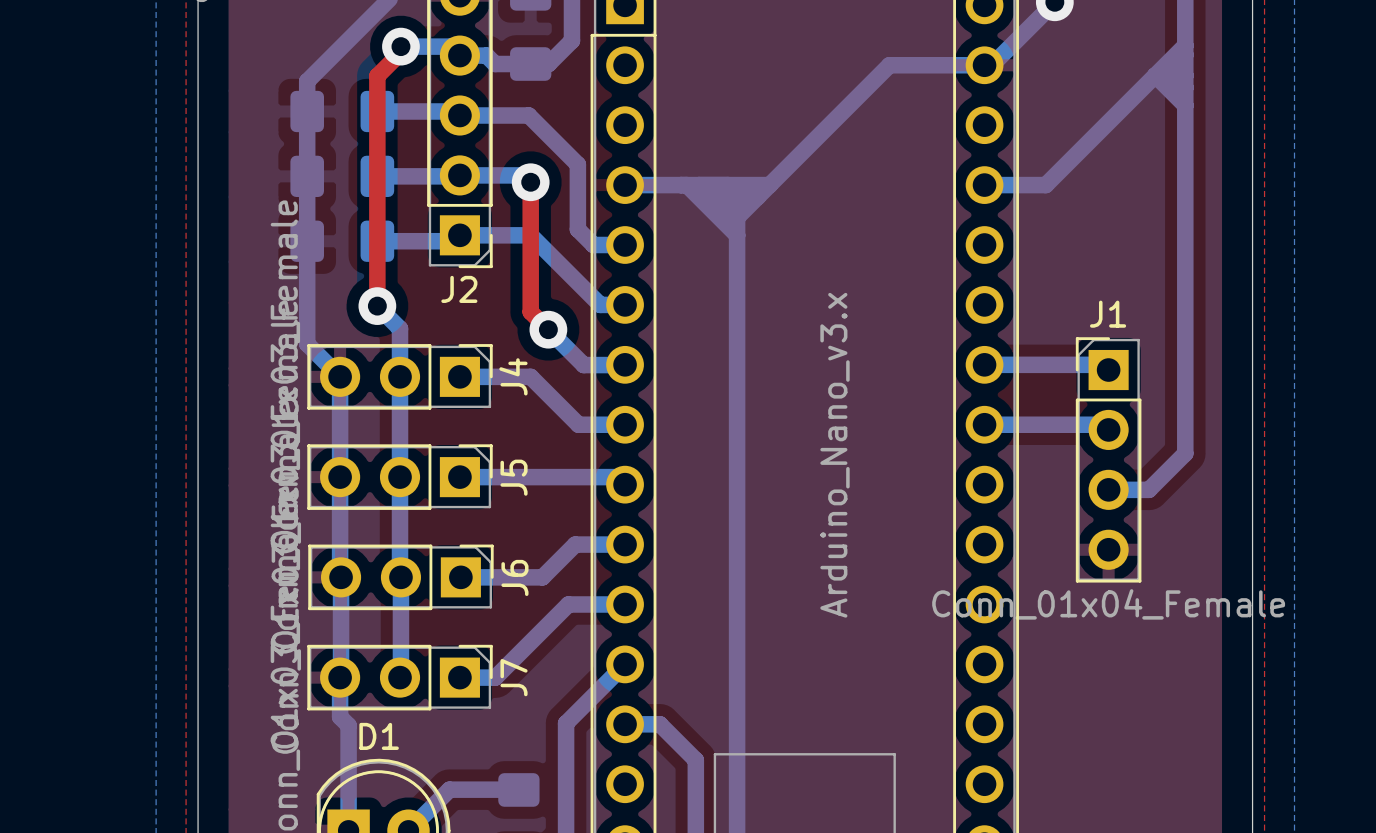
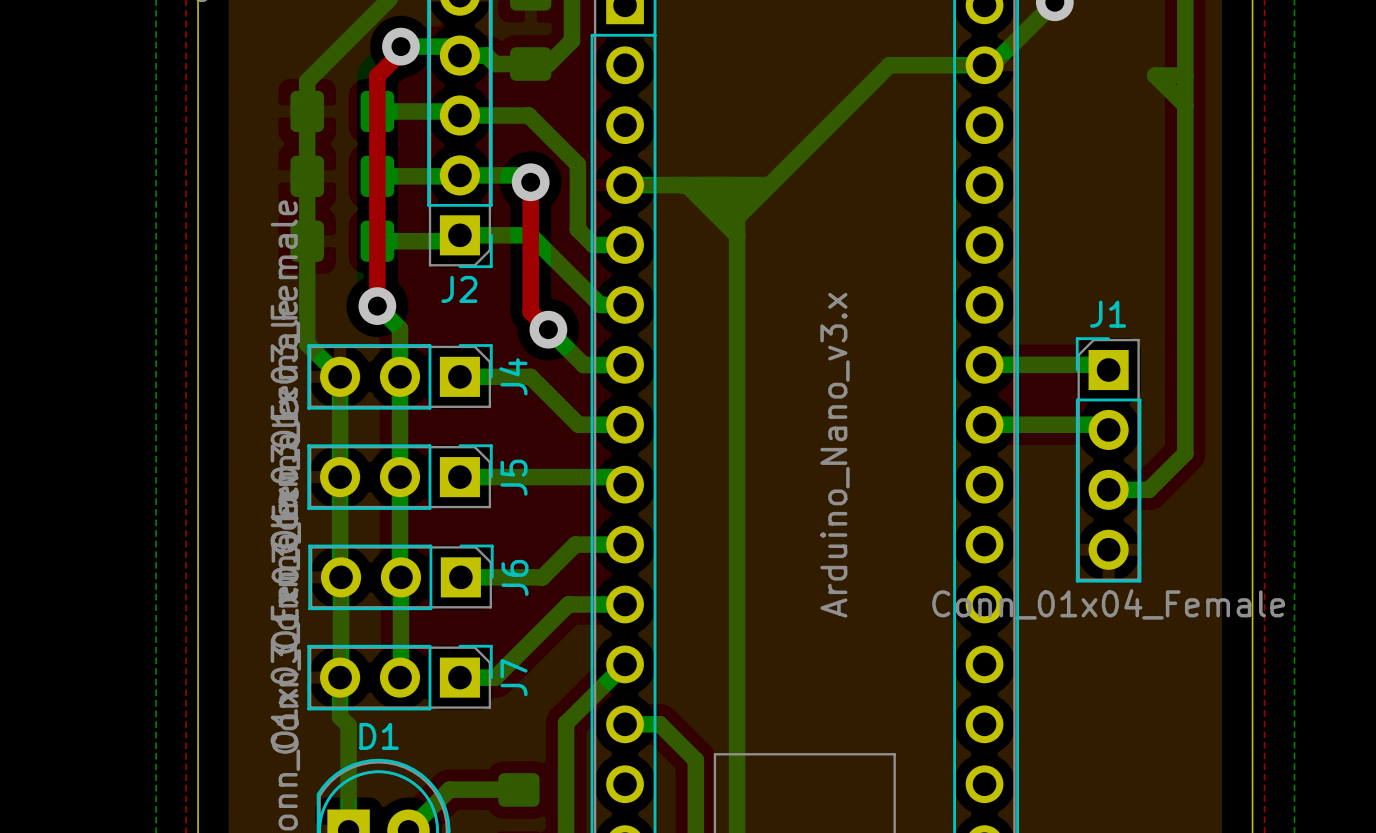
bottom track: (1185, 45) (1045, 185) (984, 185) -> none

